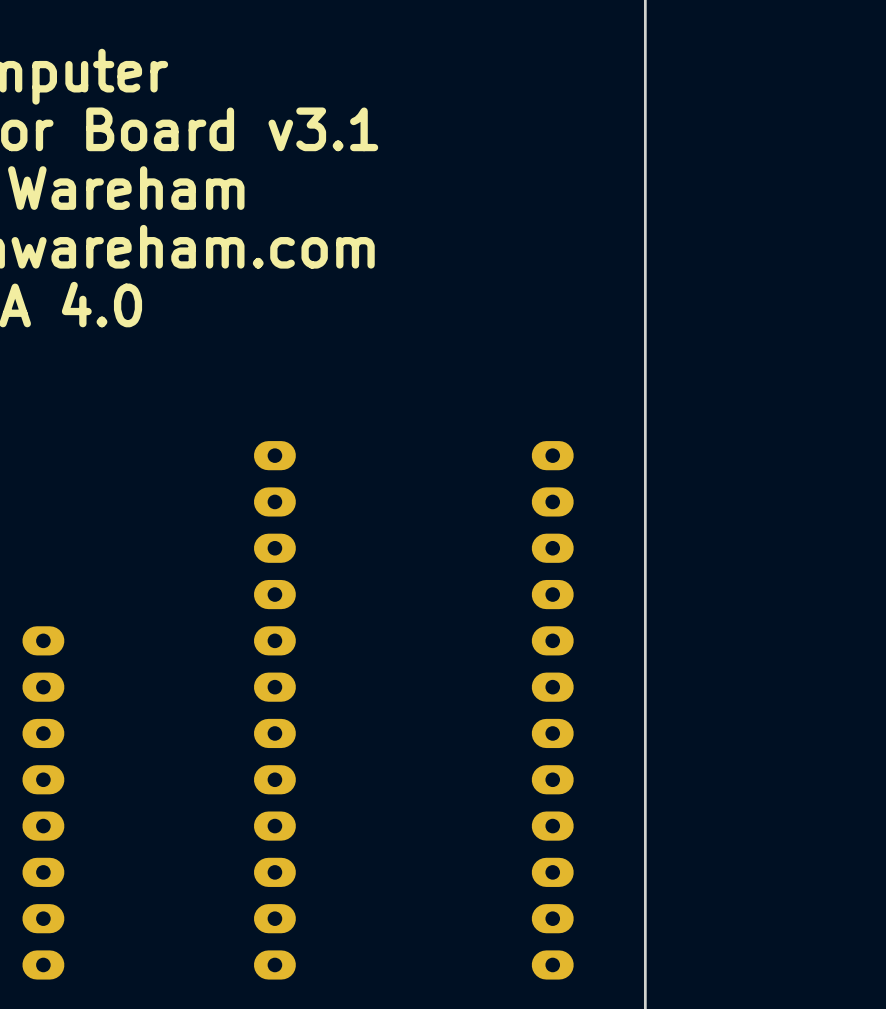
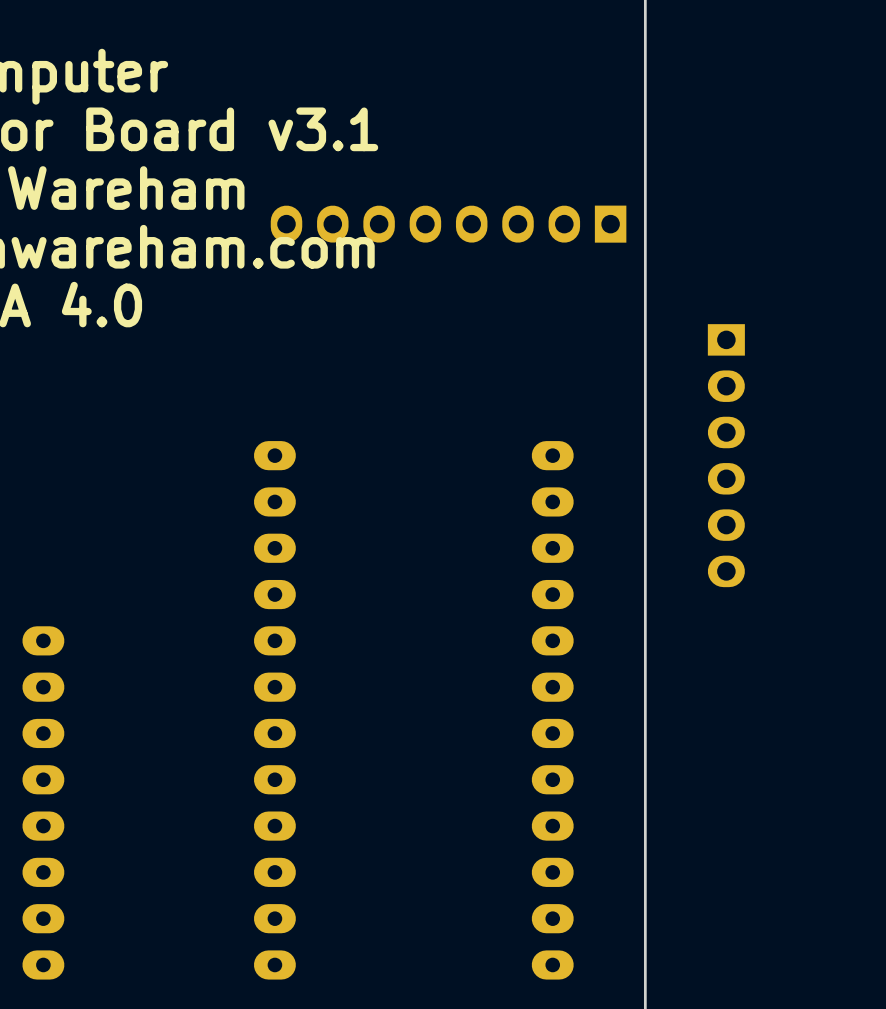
part: none -> (448, 224)
part: none -> (726, 455)

